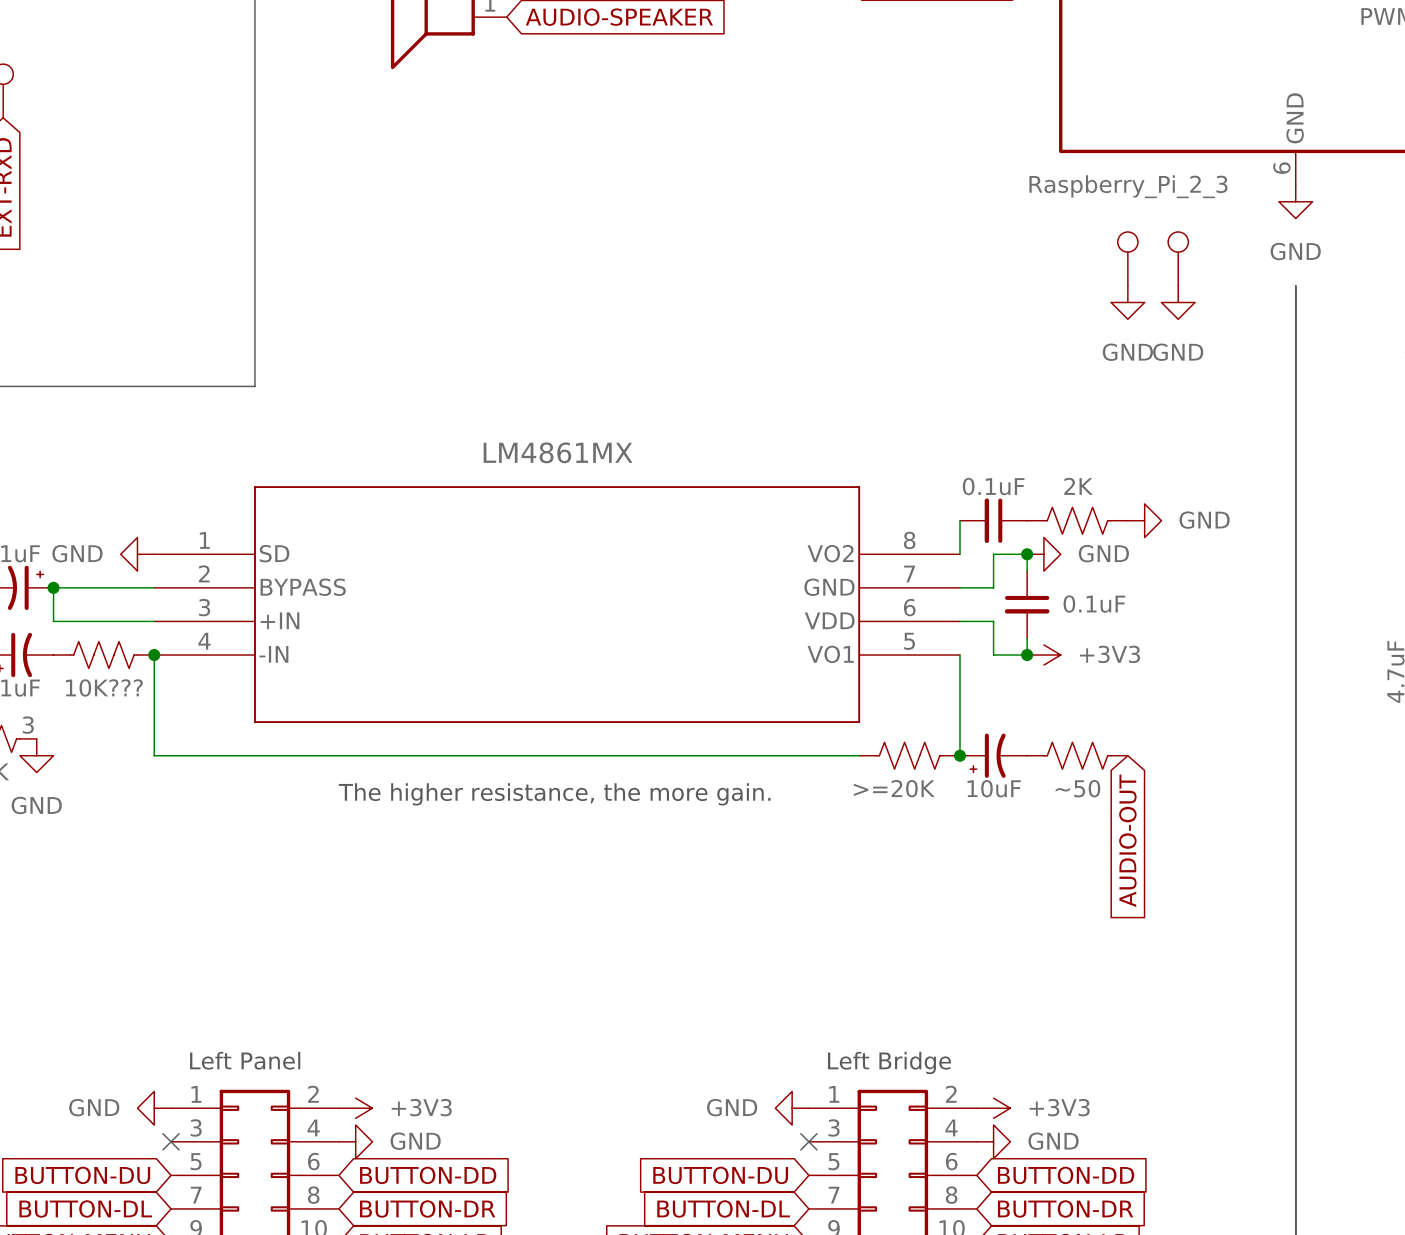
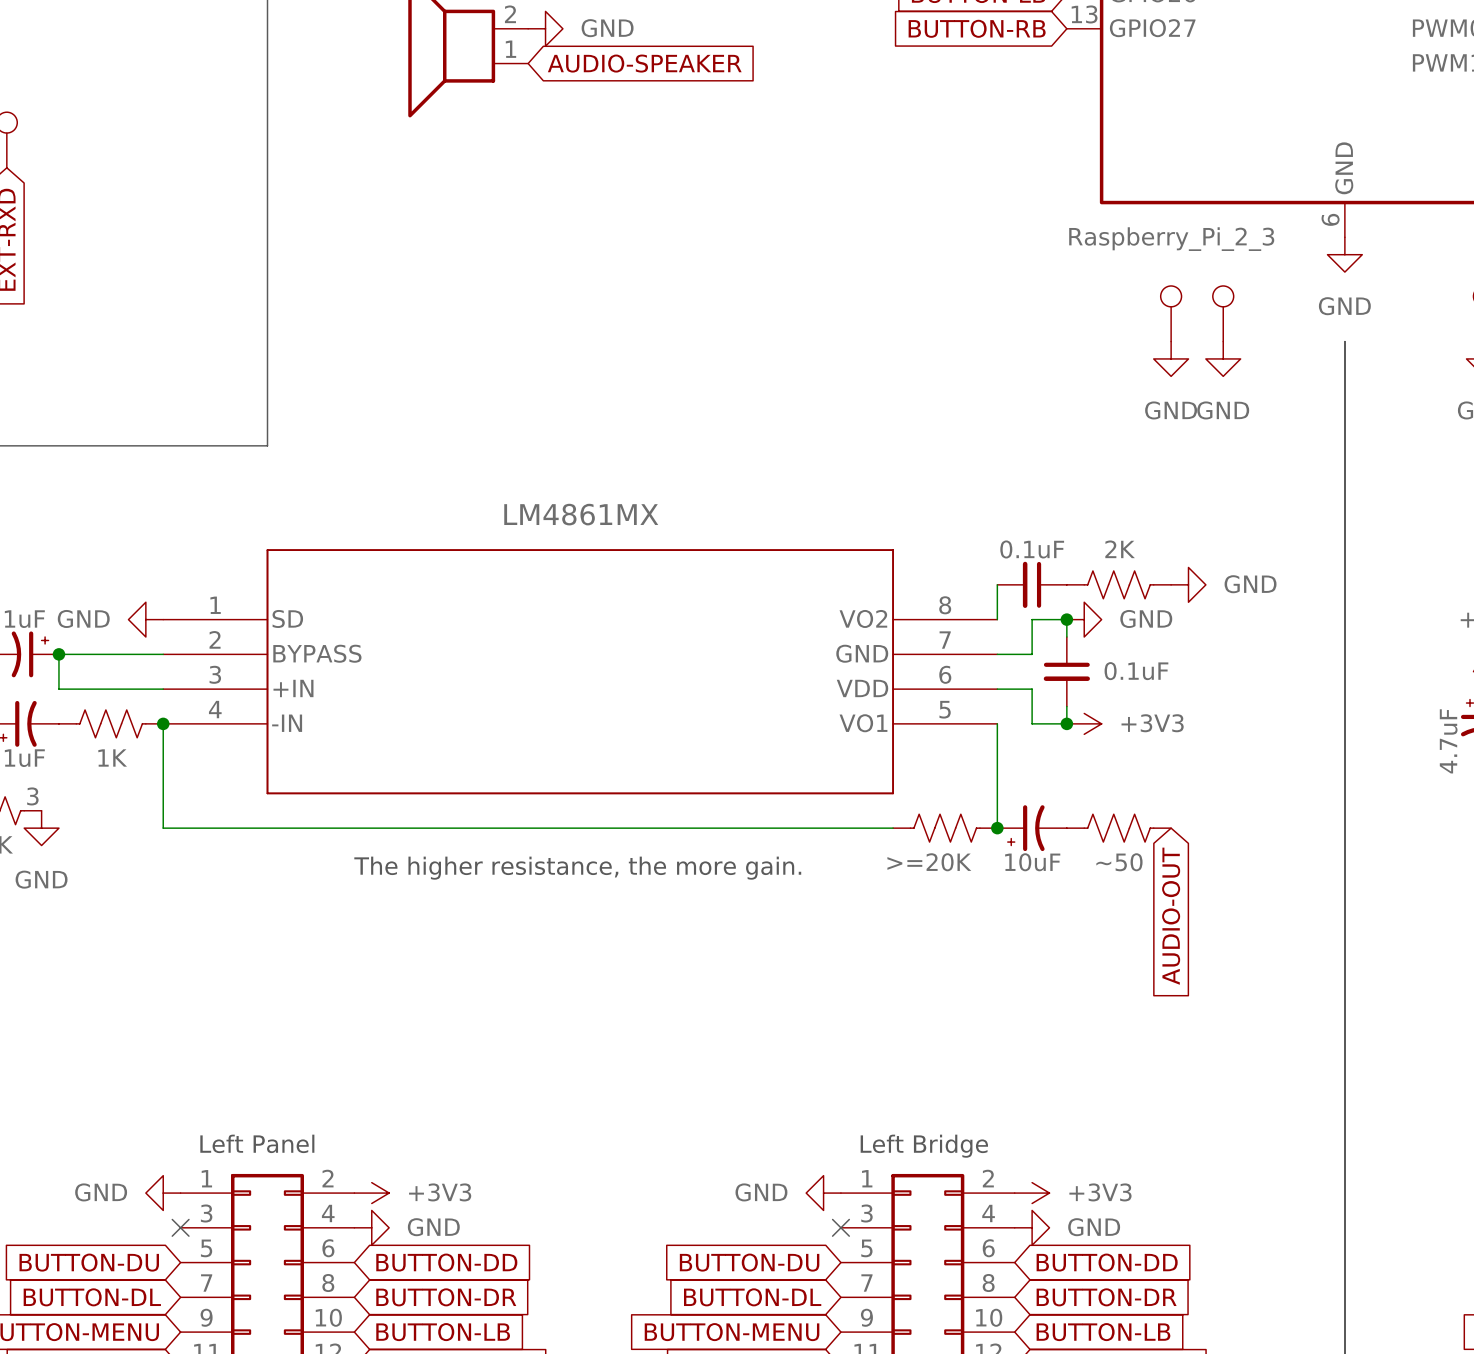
part text: 10K??? (104, 687) -> 1K (112, 757)

